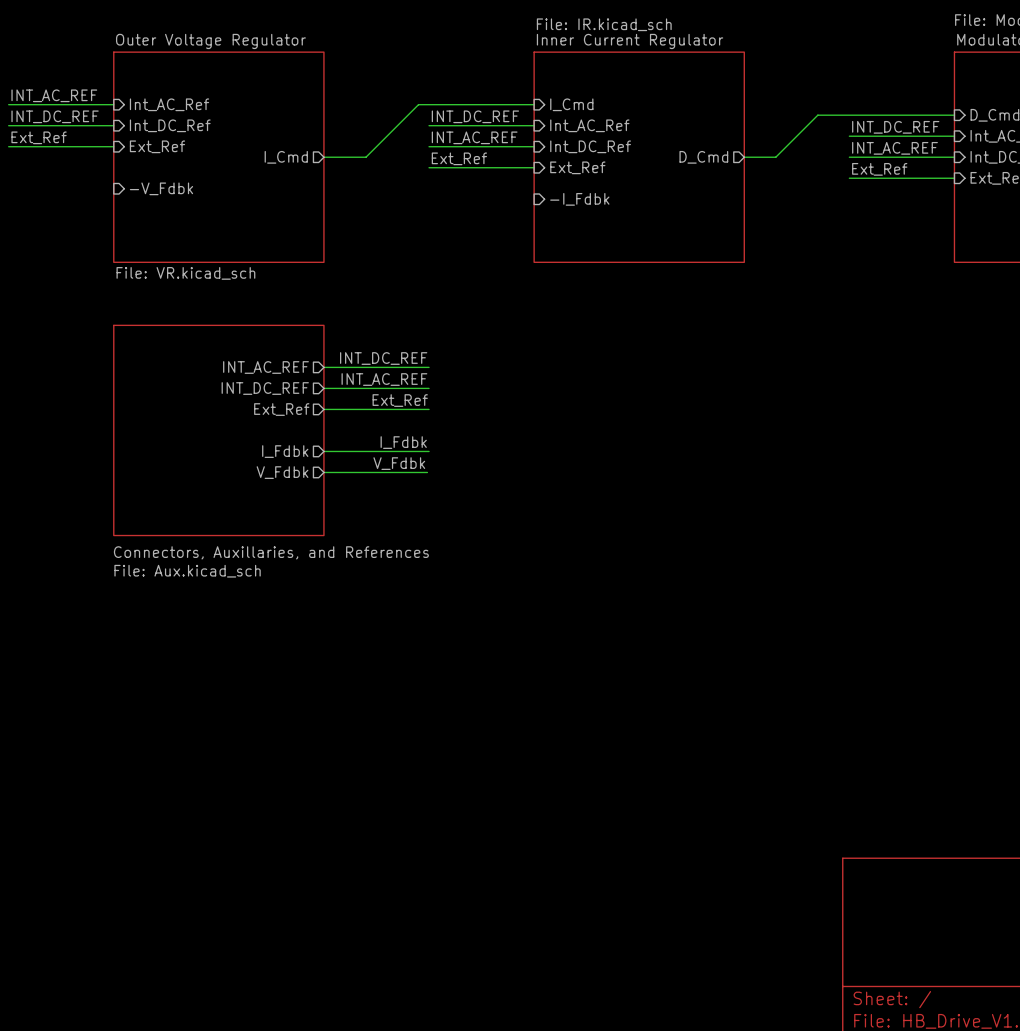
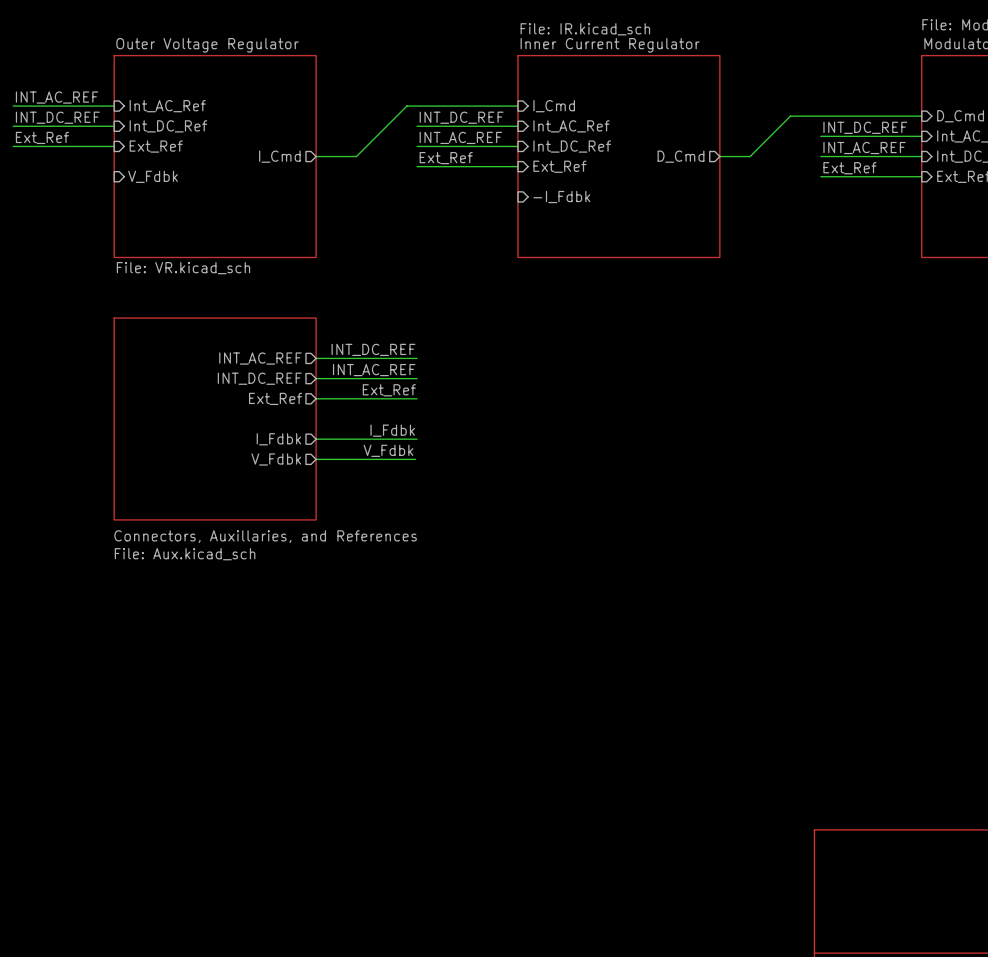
sheet pin: -V_Fdbk (161, 188) -> V_Fdbk (153, 176)

